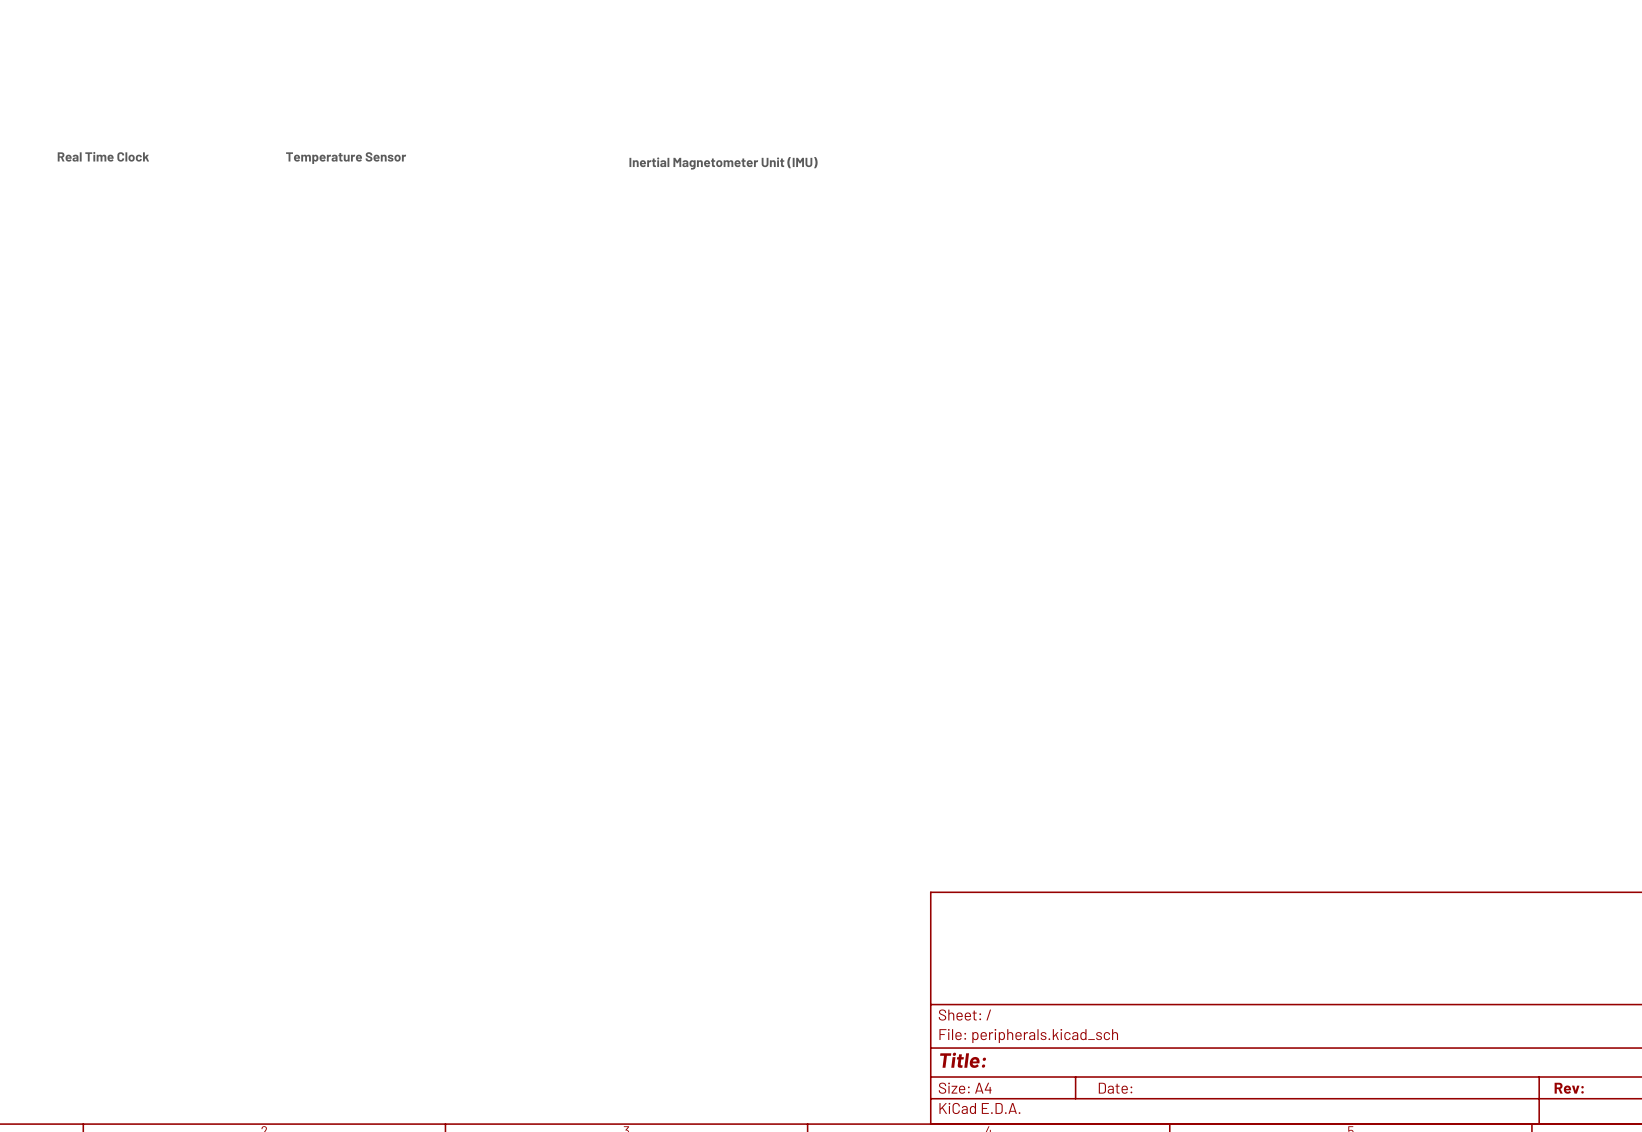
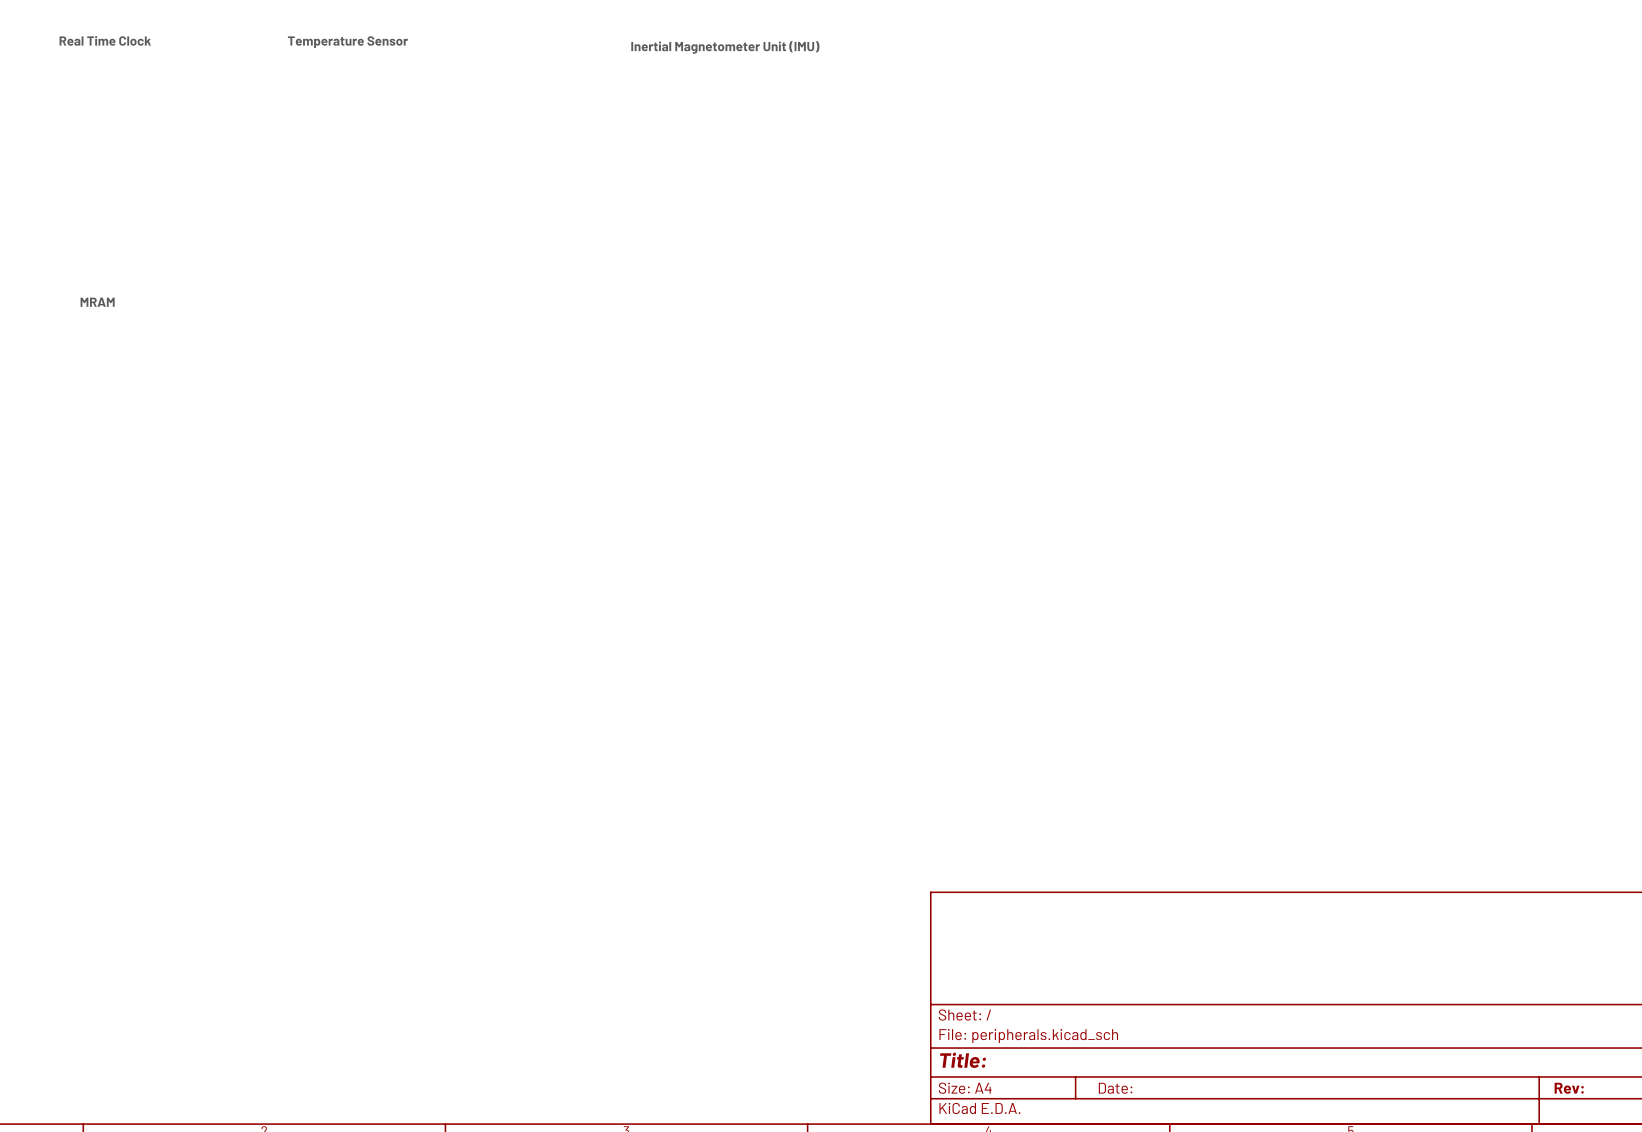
text position: Real Time Clock (103, 156) -> Real Time Clock (105, 40)
text position: Temperature Sensor (346, 158) -> Temperature Sensor (347, 42)
text position: Inertial Magnetometer Unit (IMU) (723, 163) -> Inertial Magnetometer Unit (IMU) (725, 47)
text: none -> MRAM (97, 302)

